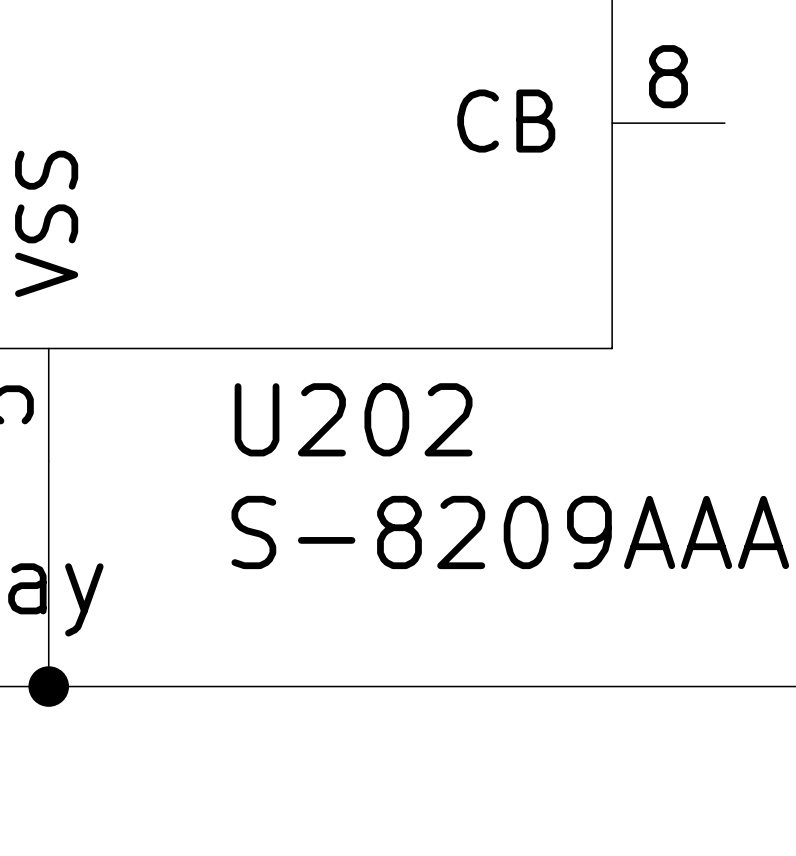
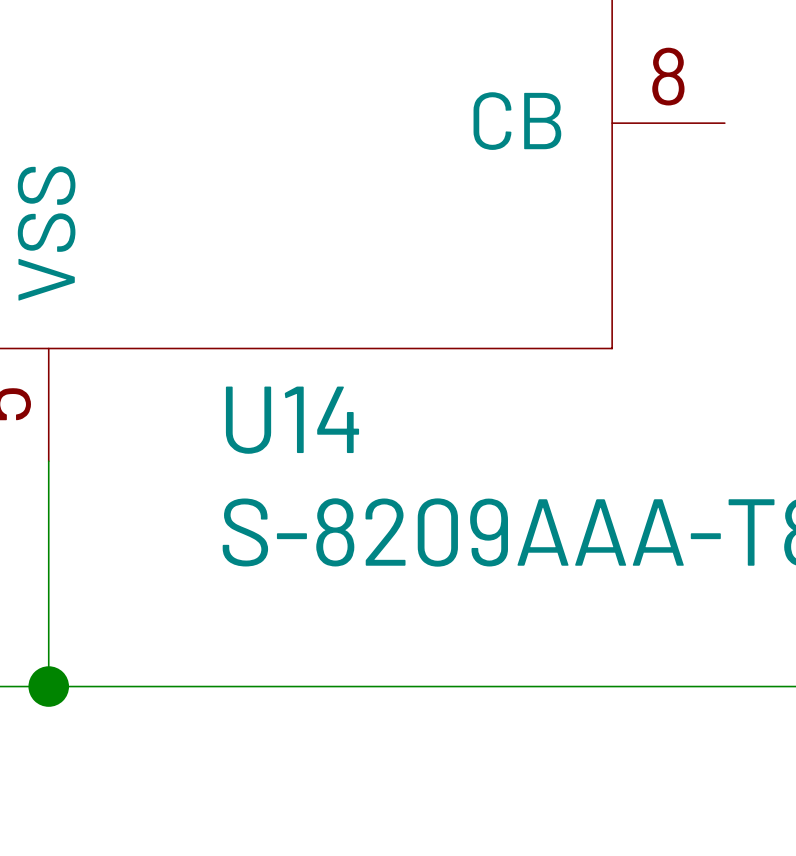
U202 name: U202 (353, 419) -> U14 (292, 420)

